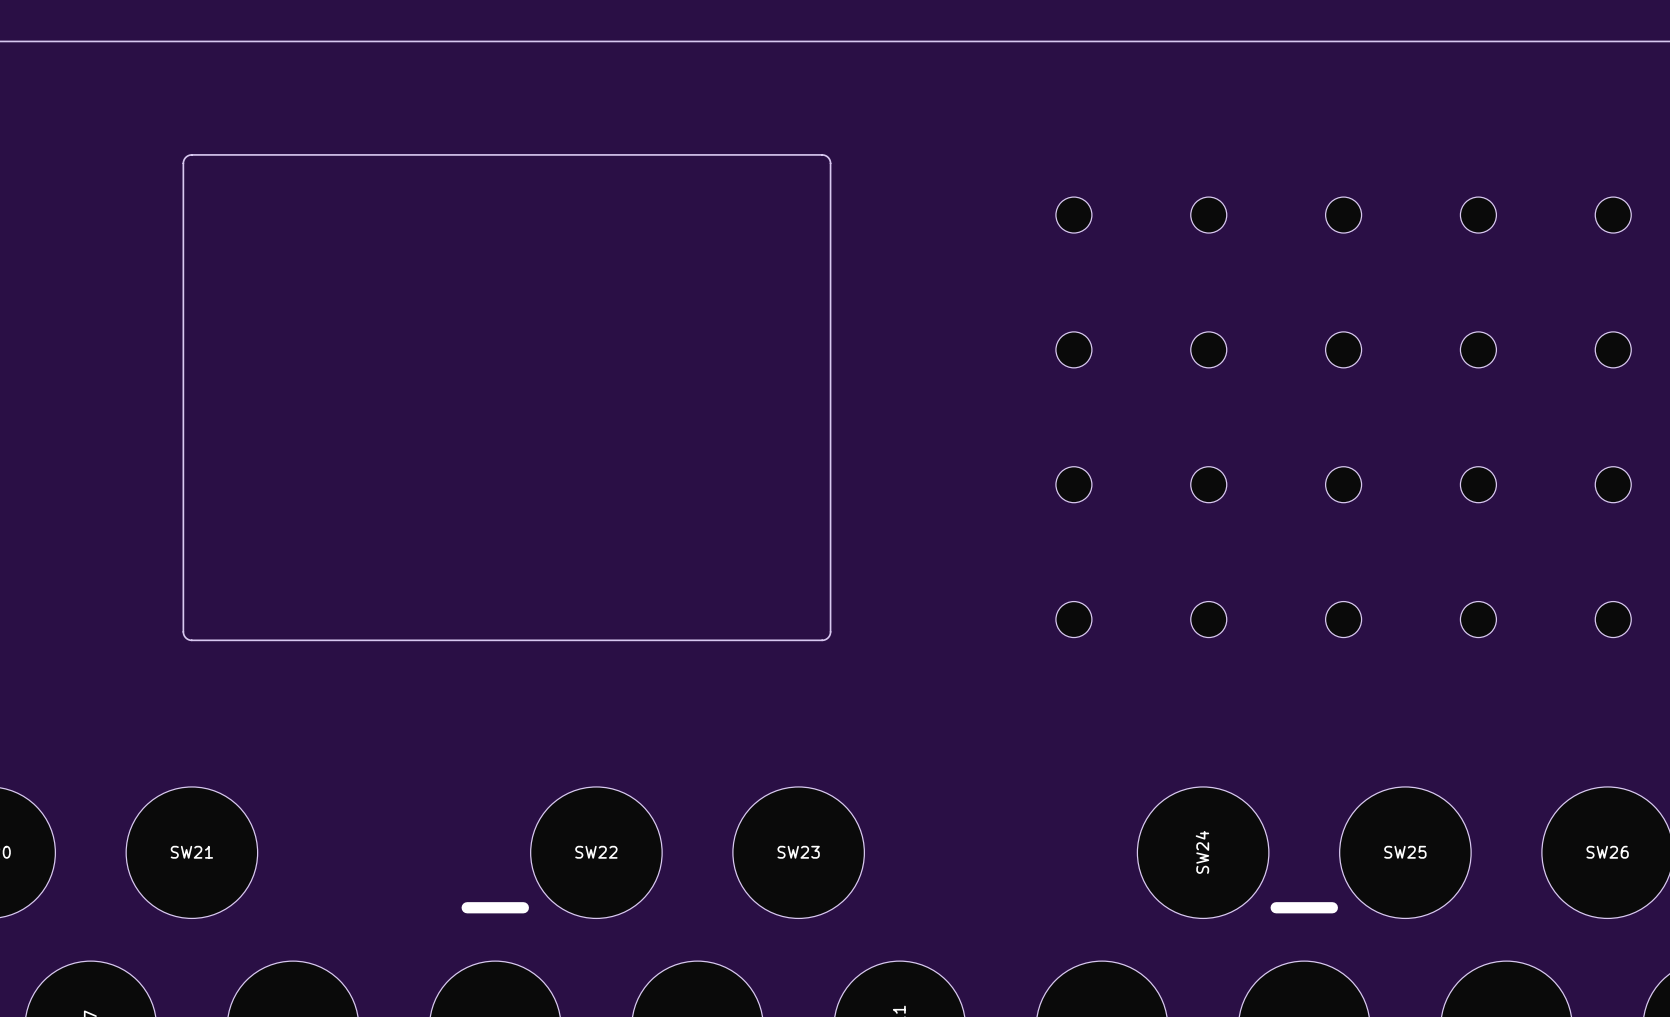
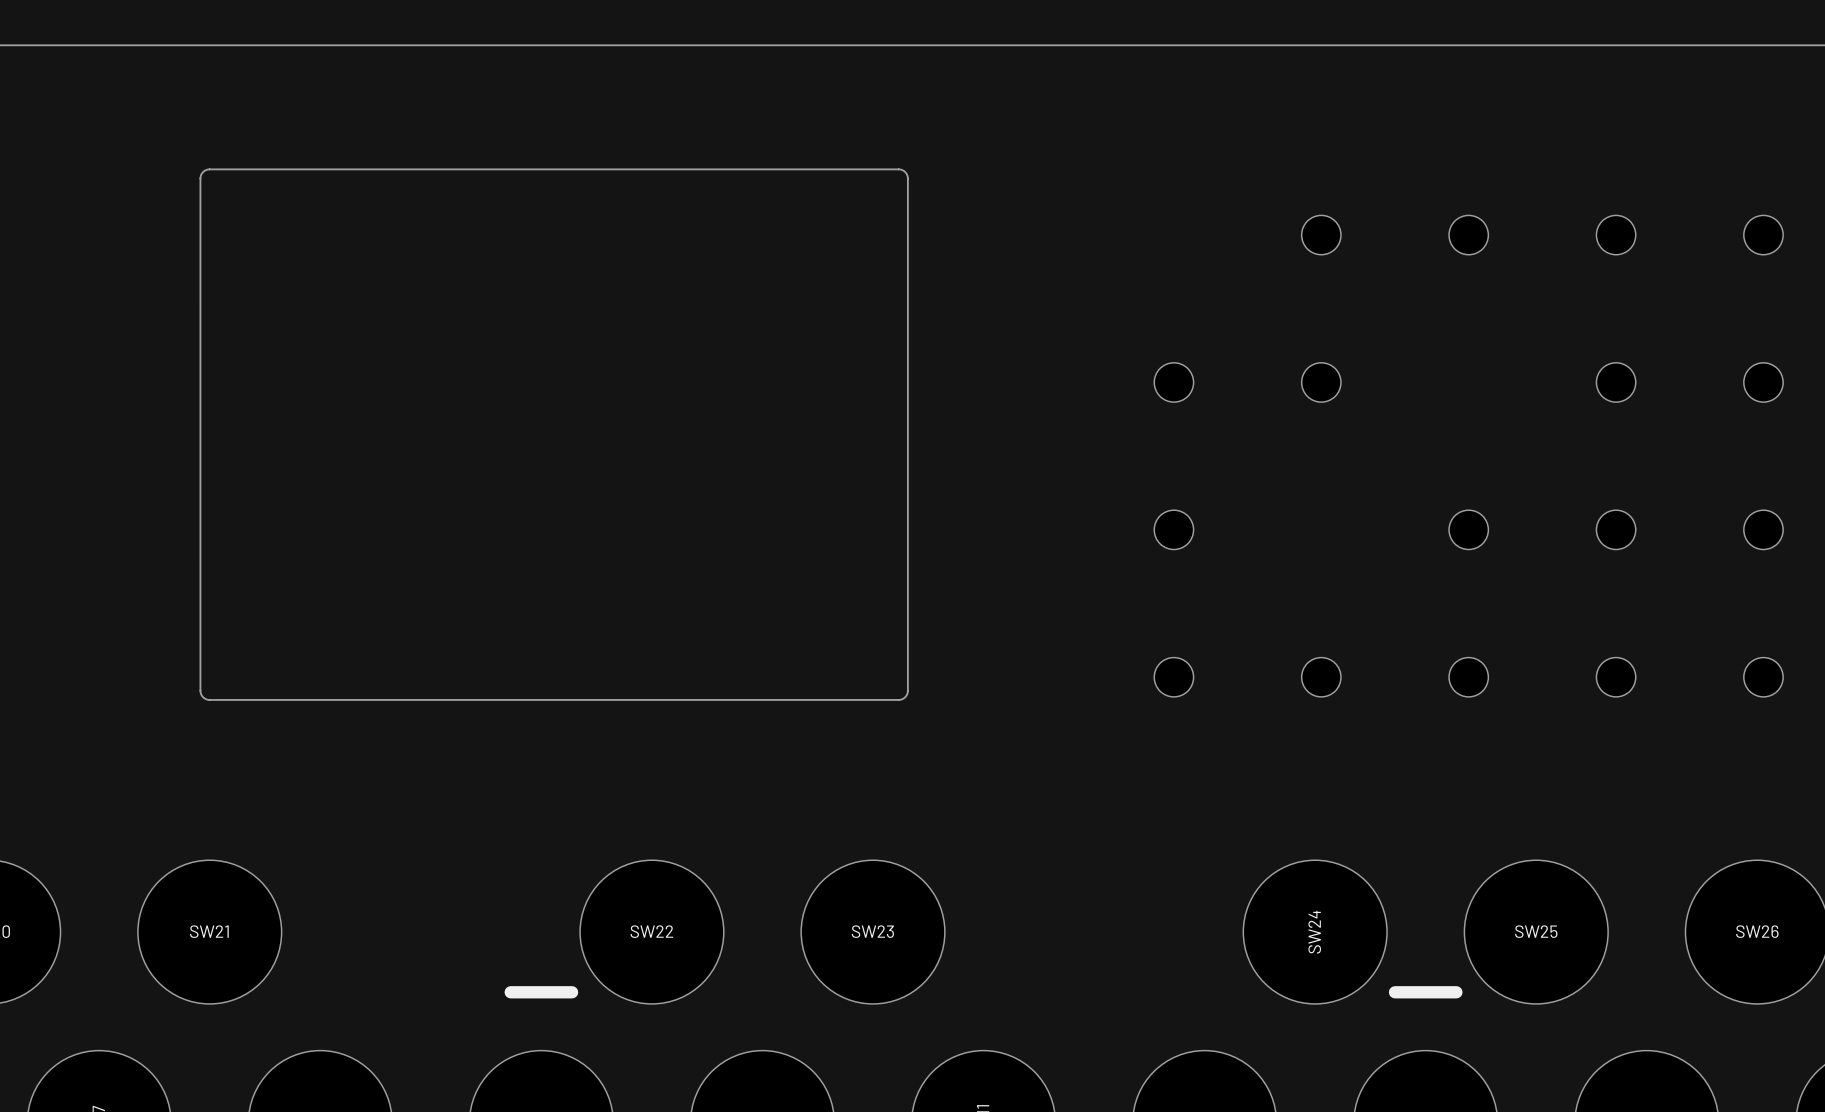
part: (1073, 215) -> none
part: (1343, 349) -> none
part: (1208, 484) -> none

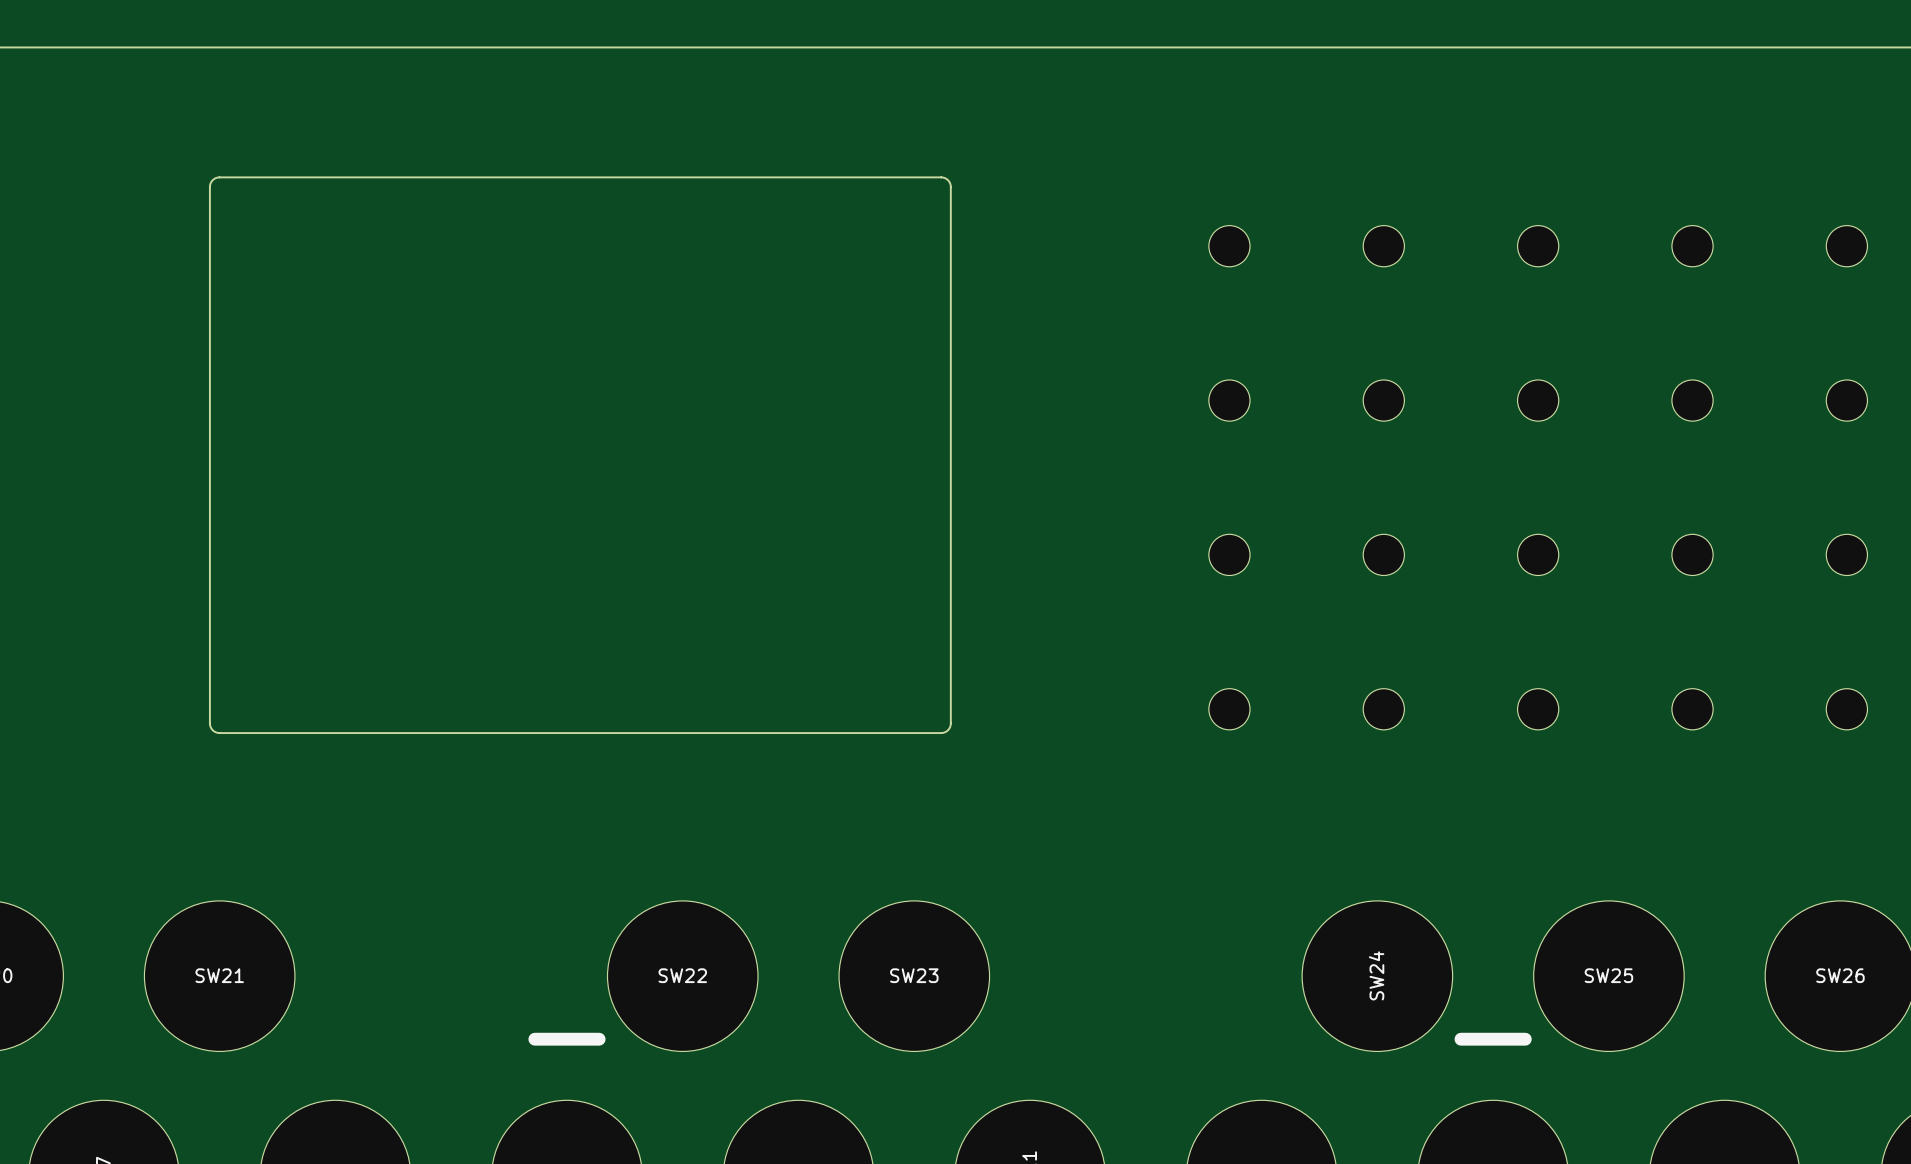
part: none -> (1229, 246)
part: none -> (1538, 400)
part: none -> (1383, 554)

